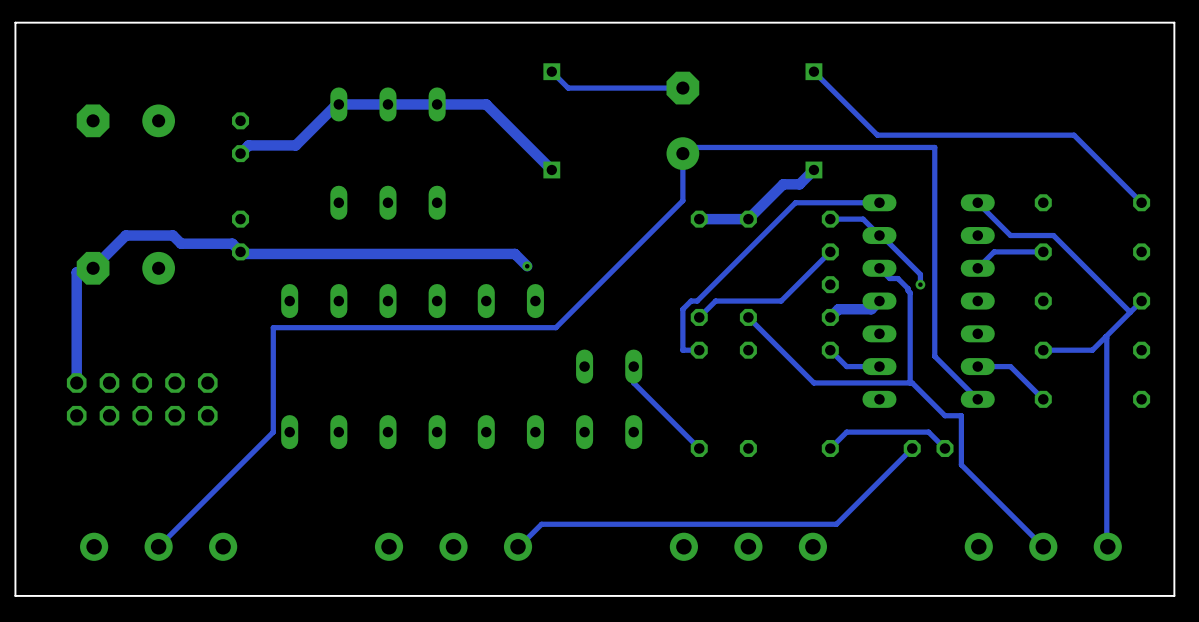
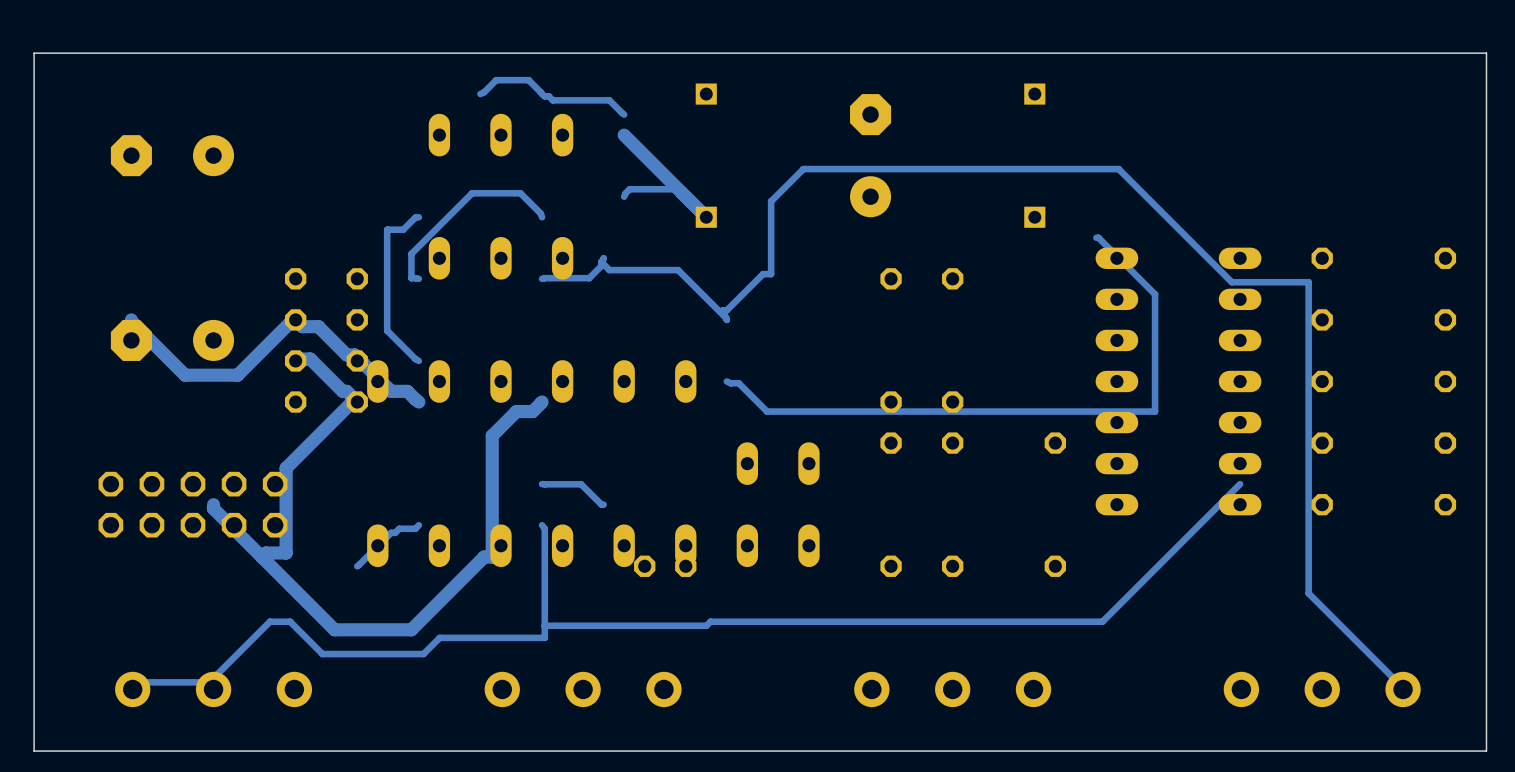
board edge: (1174, 39) (1174, 22) (15, 22) (15, 39) -> (1486, 53) (34, 53)
track: none -> (480, 94) (496, 80) (528, 80) (542, 94) (552, 100) (609, 100) (624, 114)
track: (551, 71) (568, 88) (682, 88) -> none
track: (813, 71) (877, 135) (1074, 135) (1141, 202) -> none
track: (486, 104) (338, 104) (295, 145) (248, 145) (240, 153) -> none
part: (240, 137) -> none
track: none -> (678, 189) (629, 189) (624, 196)
track: none -> (418, 217) (415, 217) (403, 229) (387, 229) (387, 330) (418, 360)
track: none -> (542, 217) (540, 213) (520, 193) (472, 193) (411, 253) (411, 278) (418, 278)
track: (813, 169) (799, 184) (783, 184) (748, 219) (699, 219) -> none
track: none -> (1096, 237) (1155, 294) (1155, 411) (767, 411) (738, 383) (726, 381)
track: (879, 202) (795, 202) (697, 301) (691, 301) (682, 309) (682, 350) (699, 350) -> none
track: (977, 202) (1010, 235) (1053, 235) (1130, 312) -> none
track: (830, 219) (863, 219) (920, 274) (920, 284) -> none
part: none -> (295, 299)
part: (240, 235) -> none
part: none -> (357, 299)
part: (830, 235) -> none
track: none -> (131, 319) (185, 375) (237, 375) (290, 322) (295, 319) (302, 326) (318, 326) (346, 354) (354, 354) (358, 363) (362, 363) (391, 391) (407, 391) (418, 402)
track: (830, 251) (781, 301) (715, 301) (699, 317) -> none
track: (1043, 251) (994, 251) (977, 268) -> none
track: (527, 266) (514, 253) (244, 253) (232, 243) (181, 243) (172, 235) (125, 235) (91, 272) (76, 272) (76, 382) -> none
via: (527, 266) -> none
track: (879, 268) (889, 278) (897, 278) (910, 292) (910, 382) -> none
track: none -> (295, 360) (298, 359) (310, 359) (342, 391) (346, 391) (357, 402) (350, 403) (286, 468) (286, 553) (265, 553) (261, 557)
via: (920, 284) -> none
part: none -> (295, 381)
part: none -> (357, 381)
part: (830, 301) -> none
track: (879, 301) (871, 309) (838, 309) (830, 317) -> none
track: (1141, 301) (1092, 350) (1043, 350) -> none
track: none -> (542, 402) (532, 411) (516, 411) (492, 435) (492, 557) (484, 557) (411, 629) (334, 629) (213, 508) (213, 504)
track: (748, 317) (813, 382) (912, 382) (945, 415) (961, 415) (961, 464) (1043, 546) -> none
track: (1105, 336) (1107, 546) -> (542, 278) (589, 278) (601, 266) (603, 258) (601, 262) (609, 270) (678, 270) (726, 319) (722, 310) (726, 310) (763, 274) (771, 274) (771, 201) (803, 169) (1118, 169) (1231, 282) (1308, 282) (1308, 593) (1403, 689)
track: (830, 350) (846, 366) (879, 366) -> none
track: (633, 366) (633, 382) (699, 448) -> none
track: (977, 366) (1010, 366) (1043, 399) -> none
track: none -> (542, 484) (581, 484) (603, 504)
track: none -> (1240, 484) (1157, 566)
track: (977, 399) (934, 356) (934, 147) (689, 147) (682, 153) (682, 200) (555, 327) (273, 327) (273, 432) (158, 546) -> none
track: none -> (418, 525) (415, 528) (399, 528) (395, 532) (391, 532) (357, 566)
track: none -> (542, 525) (544, 528) (544, 637) (439, 637) (423, 654) (322, 654) (290, 621) (269, 621) (217, 674) (217, 686) (213, 689) (217, 682) (140, 682) (132, 689)
part: none -> (665, 566)
part: (928, 448) -> none
track: (945, 448) (928, 432) (846, 432) (830, 448) -> none
track: (867, 492) (836, 524) (541, 524) (518, 546) -> (1102, 621) (710, 621) (706, 625) (544, 625)

